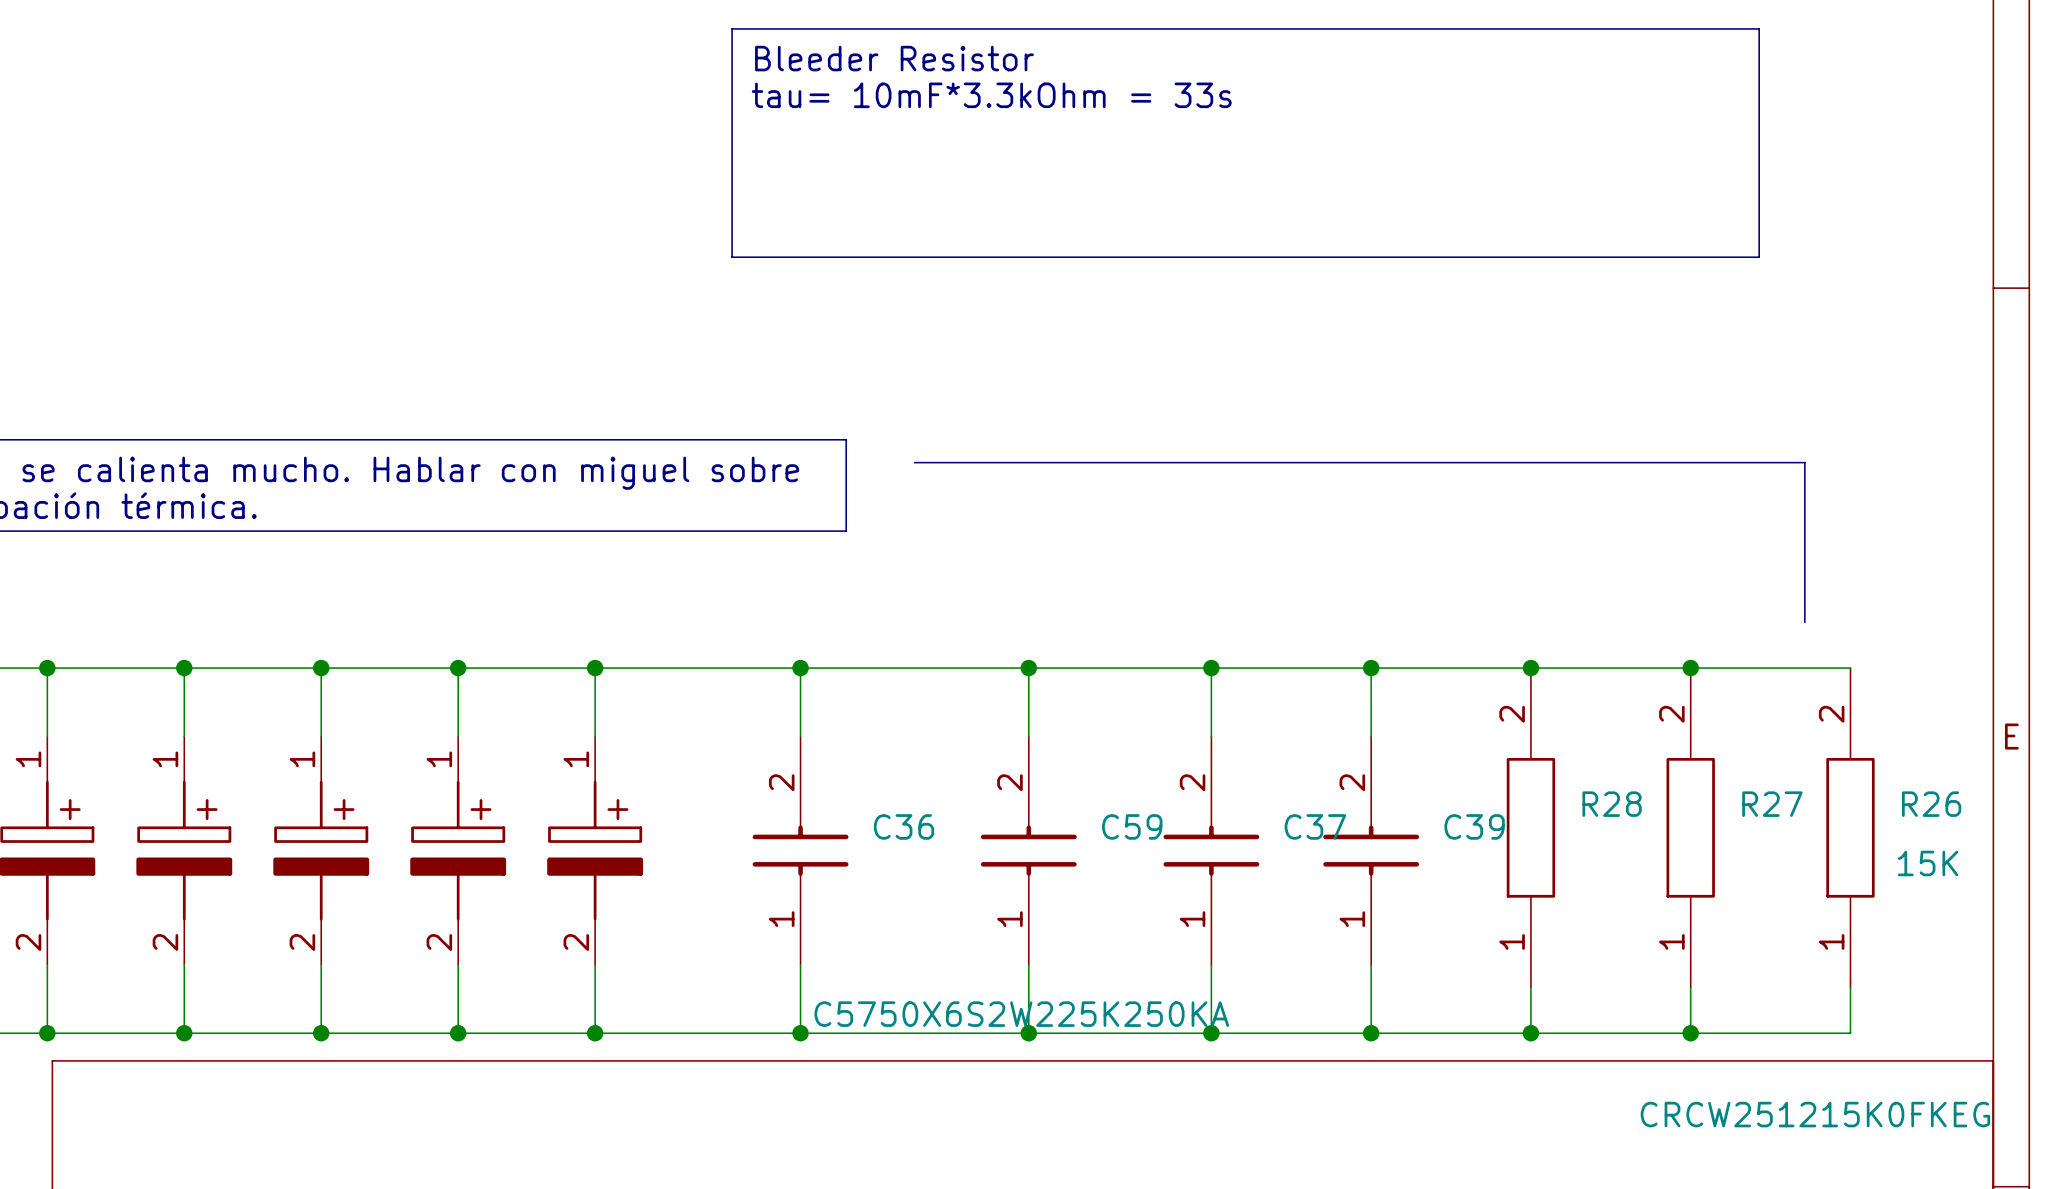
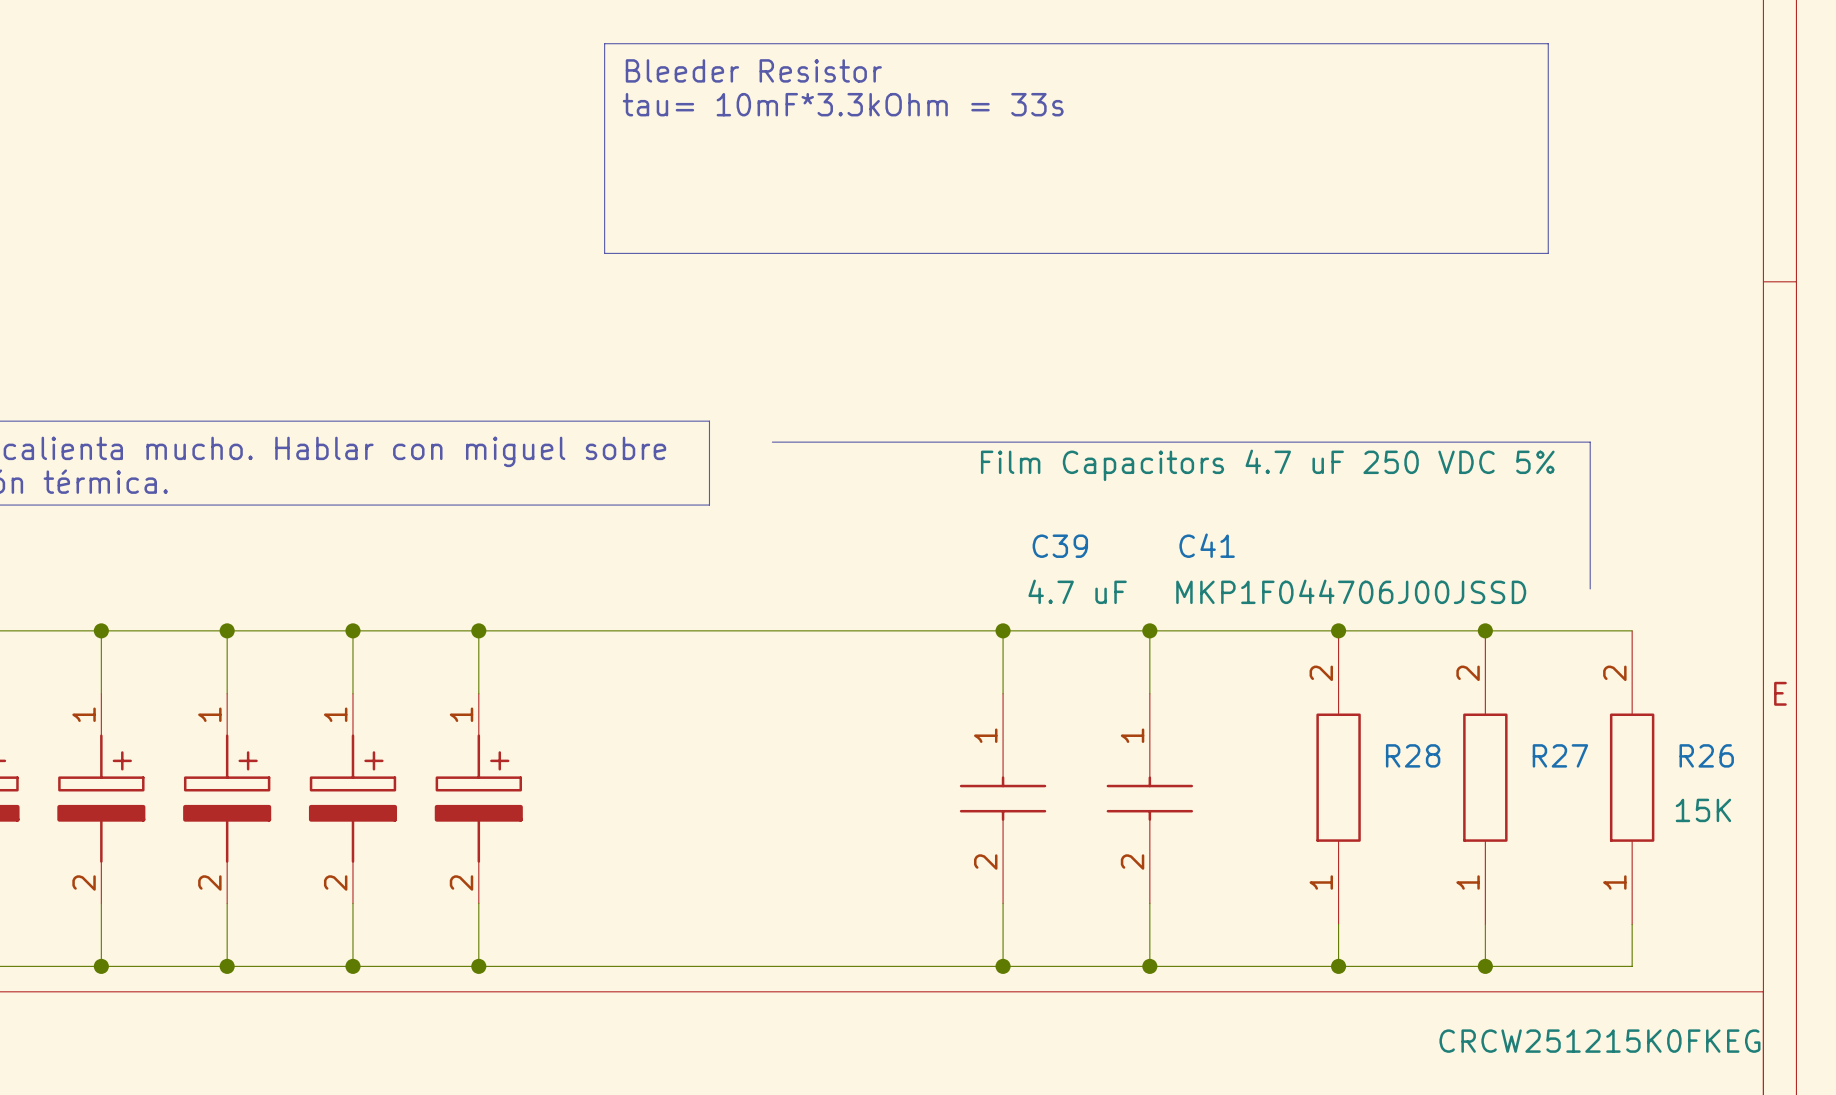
C39 text: none -> Film Capacitors 4.7 uF 250 VDC 5% (1267, 465)
C39 value: none -> 4.7 uF (1077, 591)
wire: (800, 668) (800, 736) -> none
junction: (800, 668) -> none
wire: (1028, 668) (1028, 736) -> none
junction: (1028, 668) -> none
wire: (1211, 668) (1211, 736) -> (1003, 630) (1003, 693)
junction position: (1211, 668) -> (1003, 630)
wire: (1371, 668) (1371, 736) -> (1149, 630) (1149, 693)
junction position: (1371, 668) -> (1149, 630)
C39 symbol: [1323, 736, 1420, 965] -> [959, 693, 1047, 904]
C39 name position: C39 (1474, 826) -> C39 (1060, 546)
C36: C5750X6S2W225K250KA (800, 850) -> none
C59: (1028, 850) -> none
C37: (1211, 850) -> none
C41: none -> MKP1F044706J00JSSD (1149, 798)
wire: (800, 964) (800, 1033) -> none
wire: (1028, 964) (1028, 1033) -> none
wire: (1211, 964) (1211, 1033) -> (1003, 903) (1003, 966)
wire: (1371, 964) (1371, 1033) -> (1149, 903) (1149, 966)
junction: (800, 1033) -> none
junction: (1028, 1033) -> none
junction position: (1211, 1033) -> (1003, 966)
junction position: (1371, 1033) -> (1149, 966)

